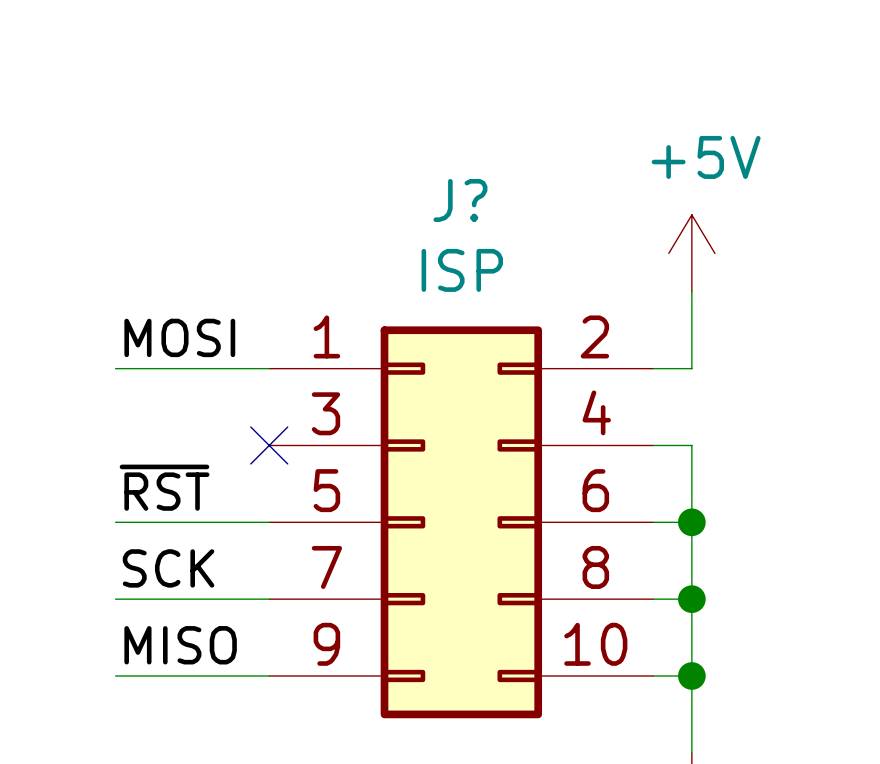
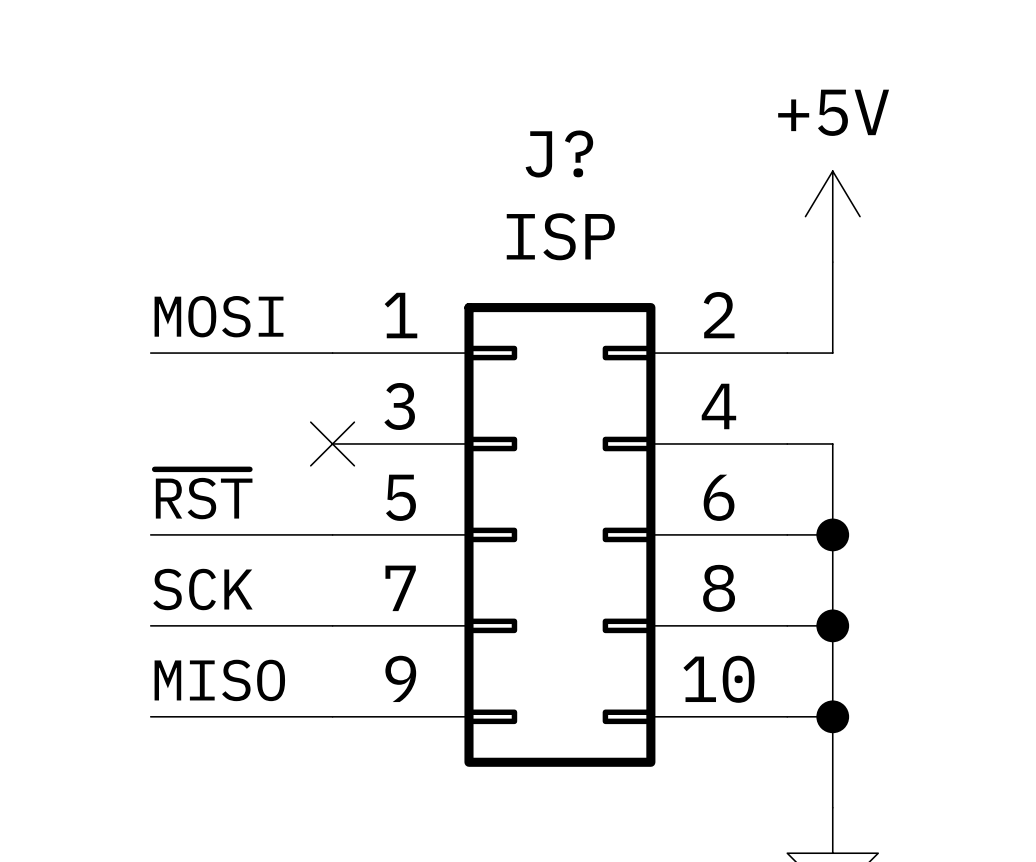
power symbol text position: +5V (706, 157) -> +5V (833, 112)

